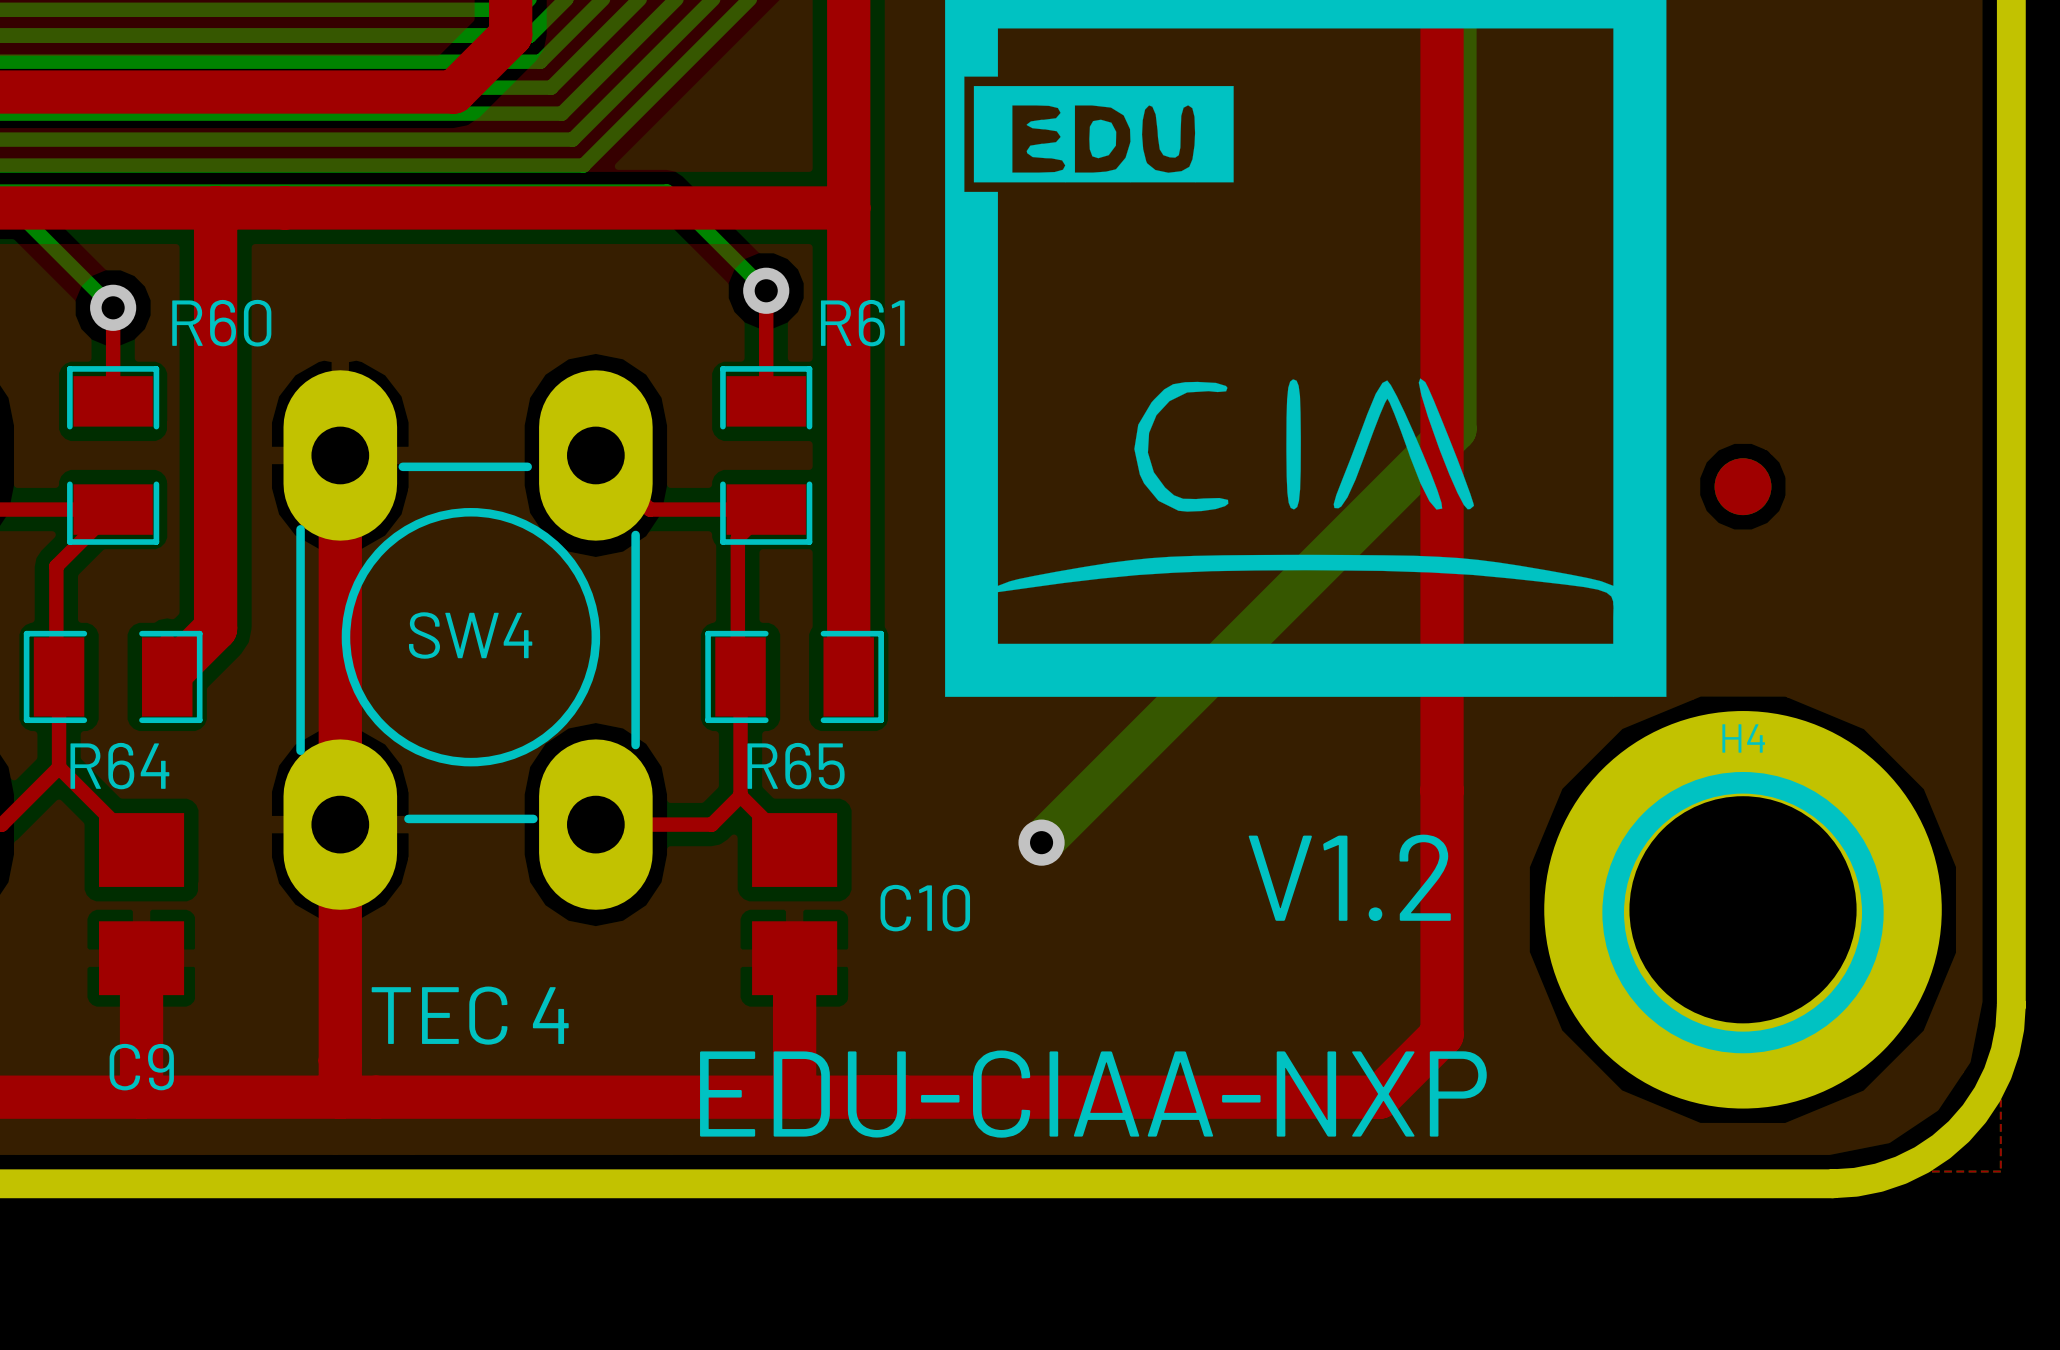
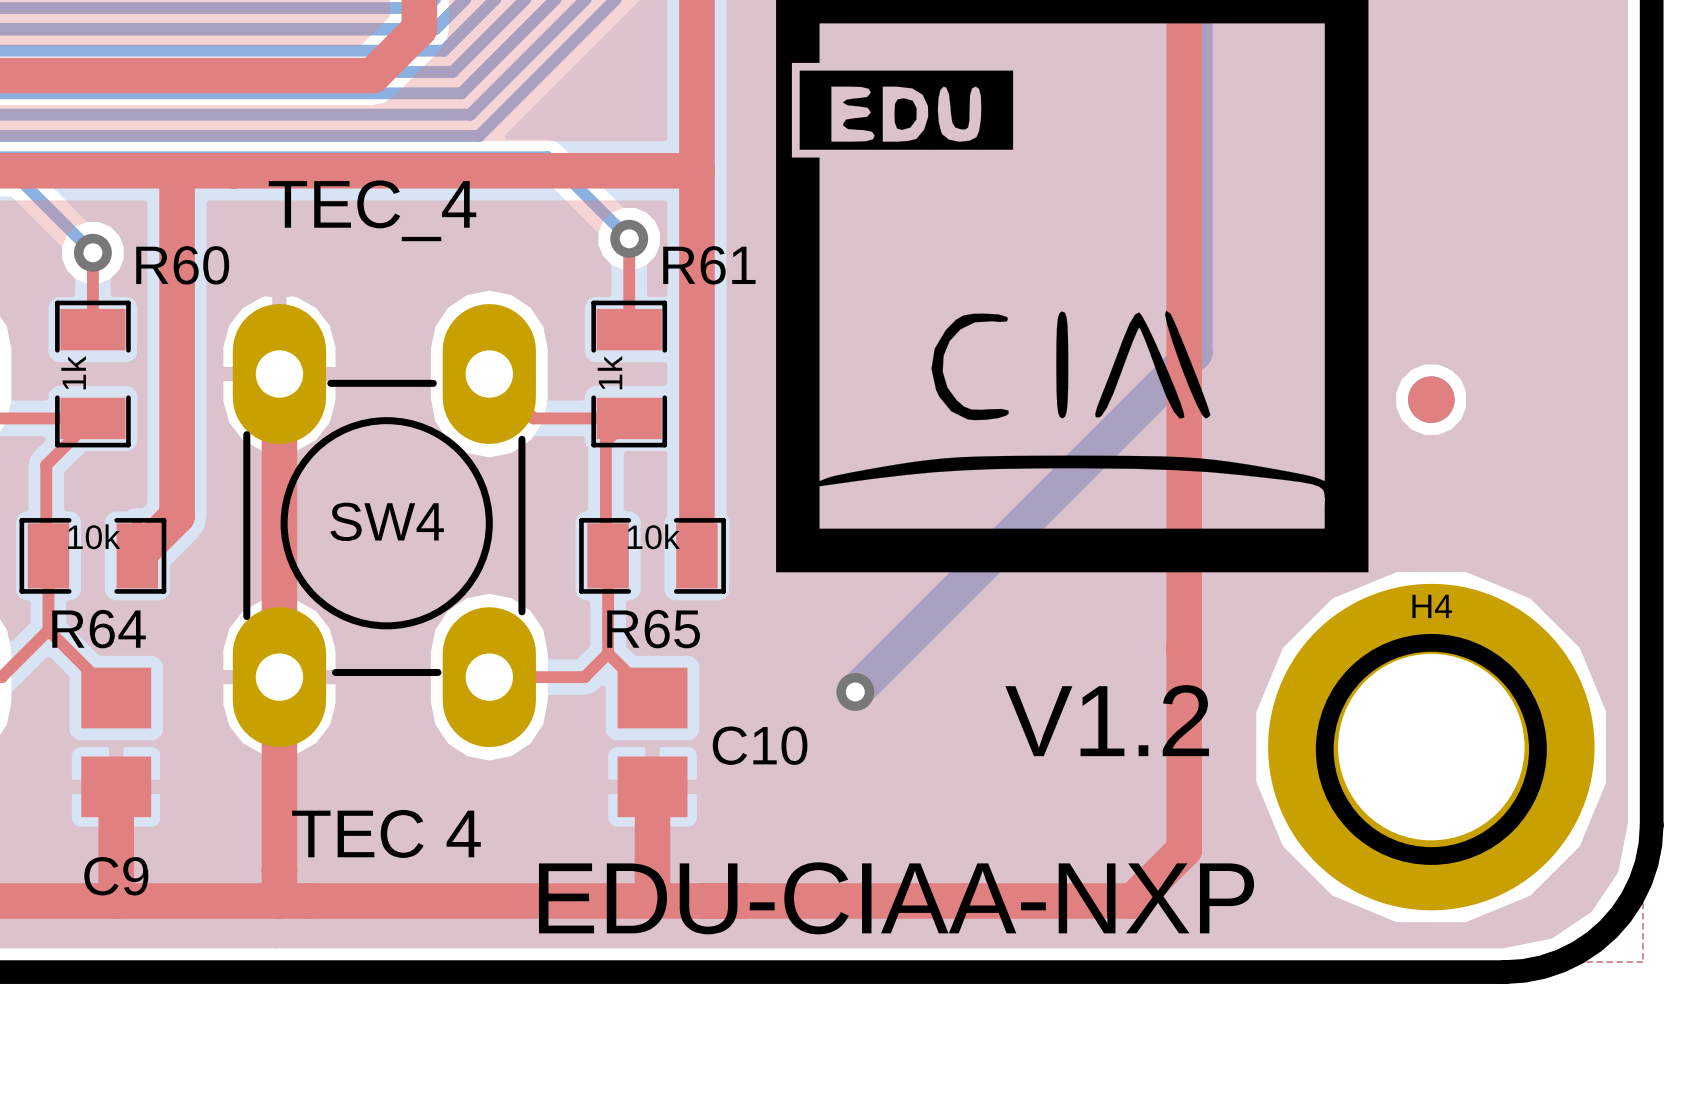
SW4 value: none -> TEC_4 (372, 210)
R60 value: none -> 1k (73, 372)
R61 value: none -> 1k (609, 372)
R64 value: none -> 10k (94, 536)
R65 value: none -> 10k (653, 536)

